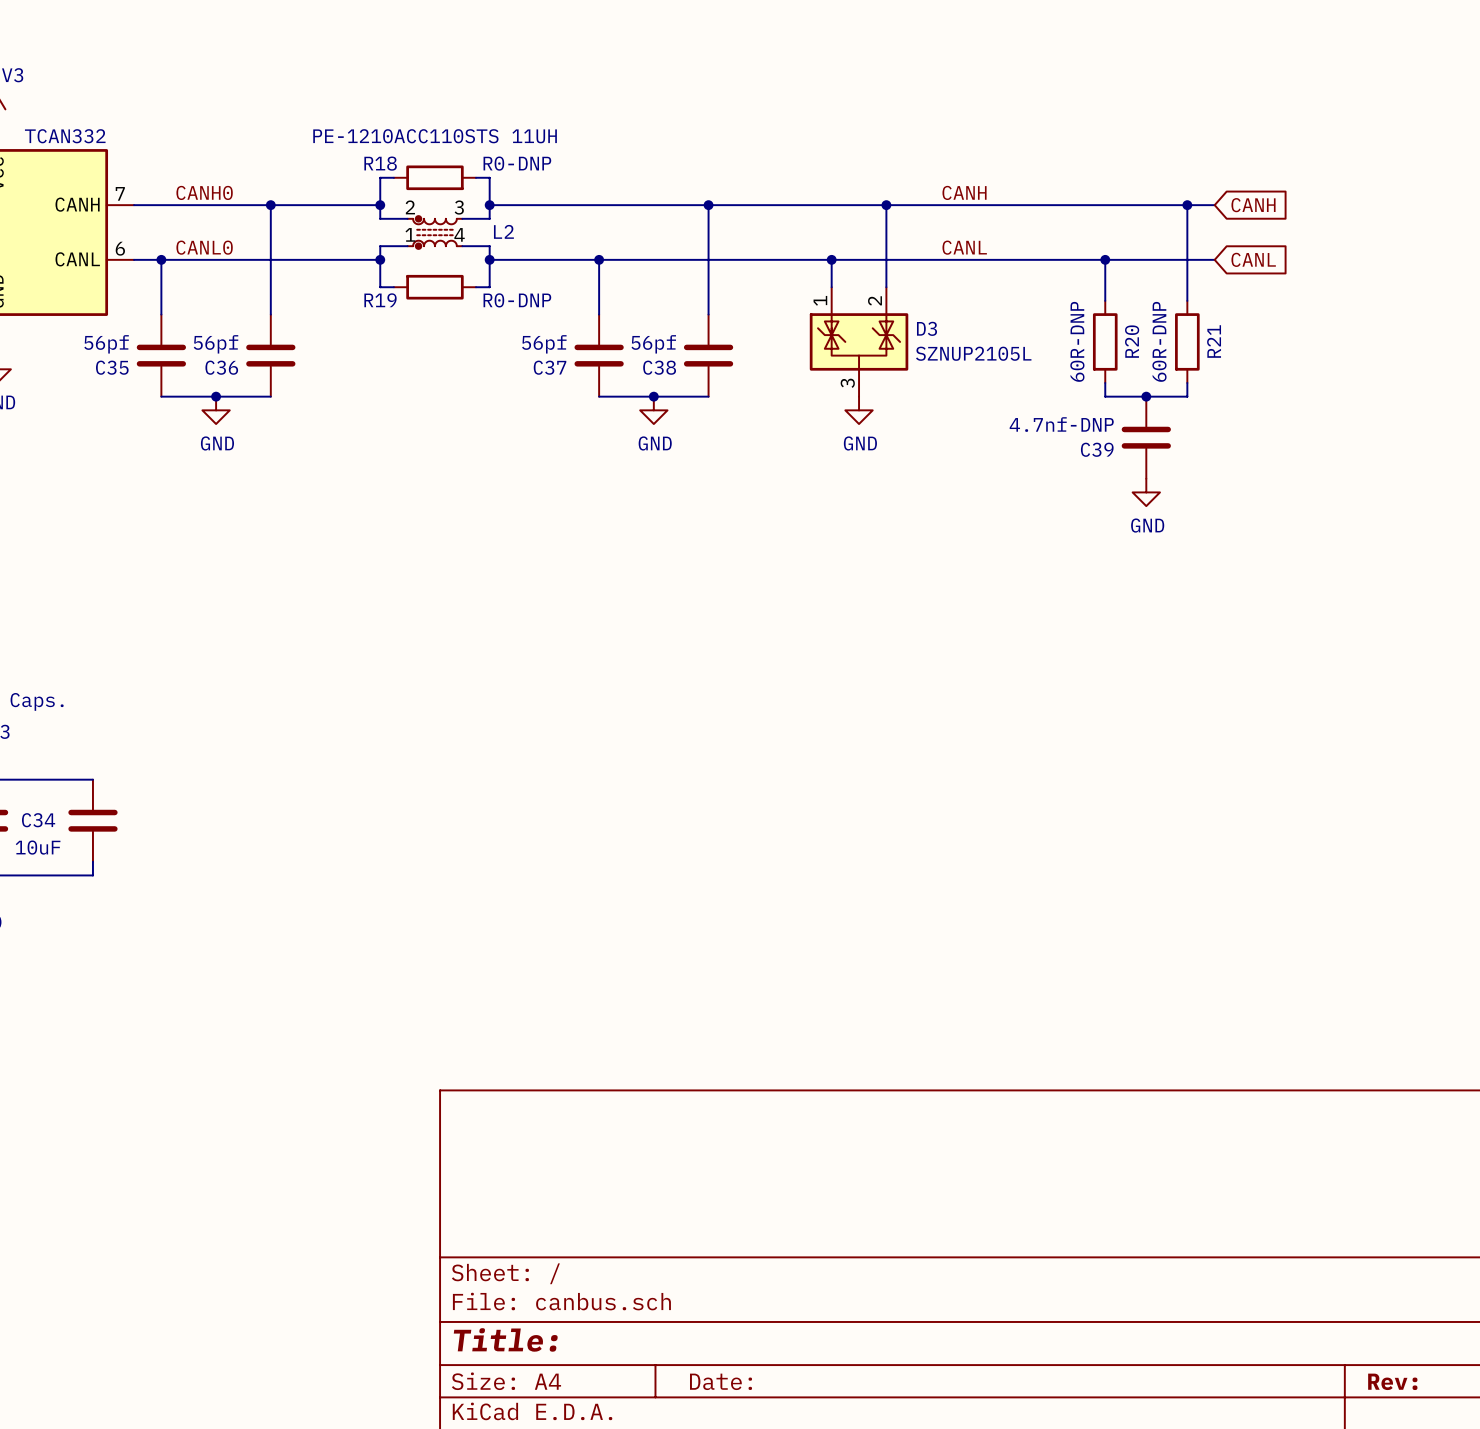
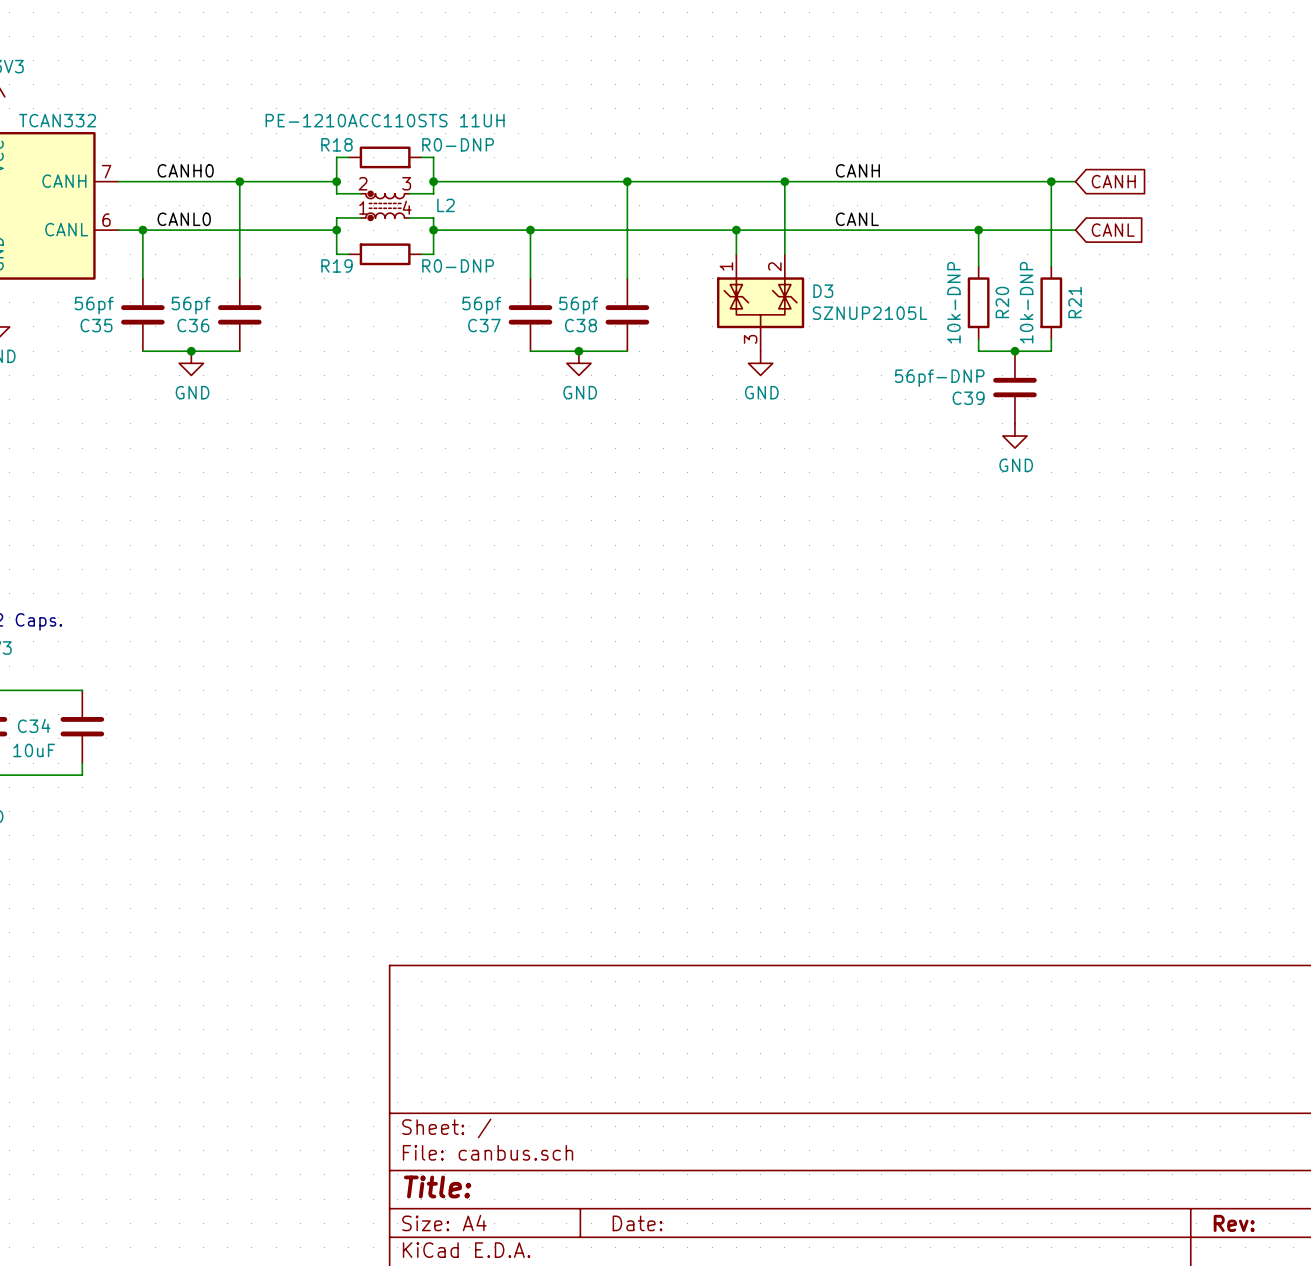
R20 value: 60R-DNP (1077, 341) -> 10k-DNP (953, 302)
R21 value: 60R-DNP (1159, 341) -> 10k-DNP (1026, 302)
C39 value: 4.7nf-DNP (1061, 424) -> 56pf-DNP (939, 378)

